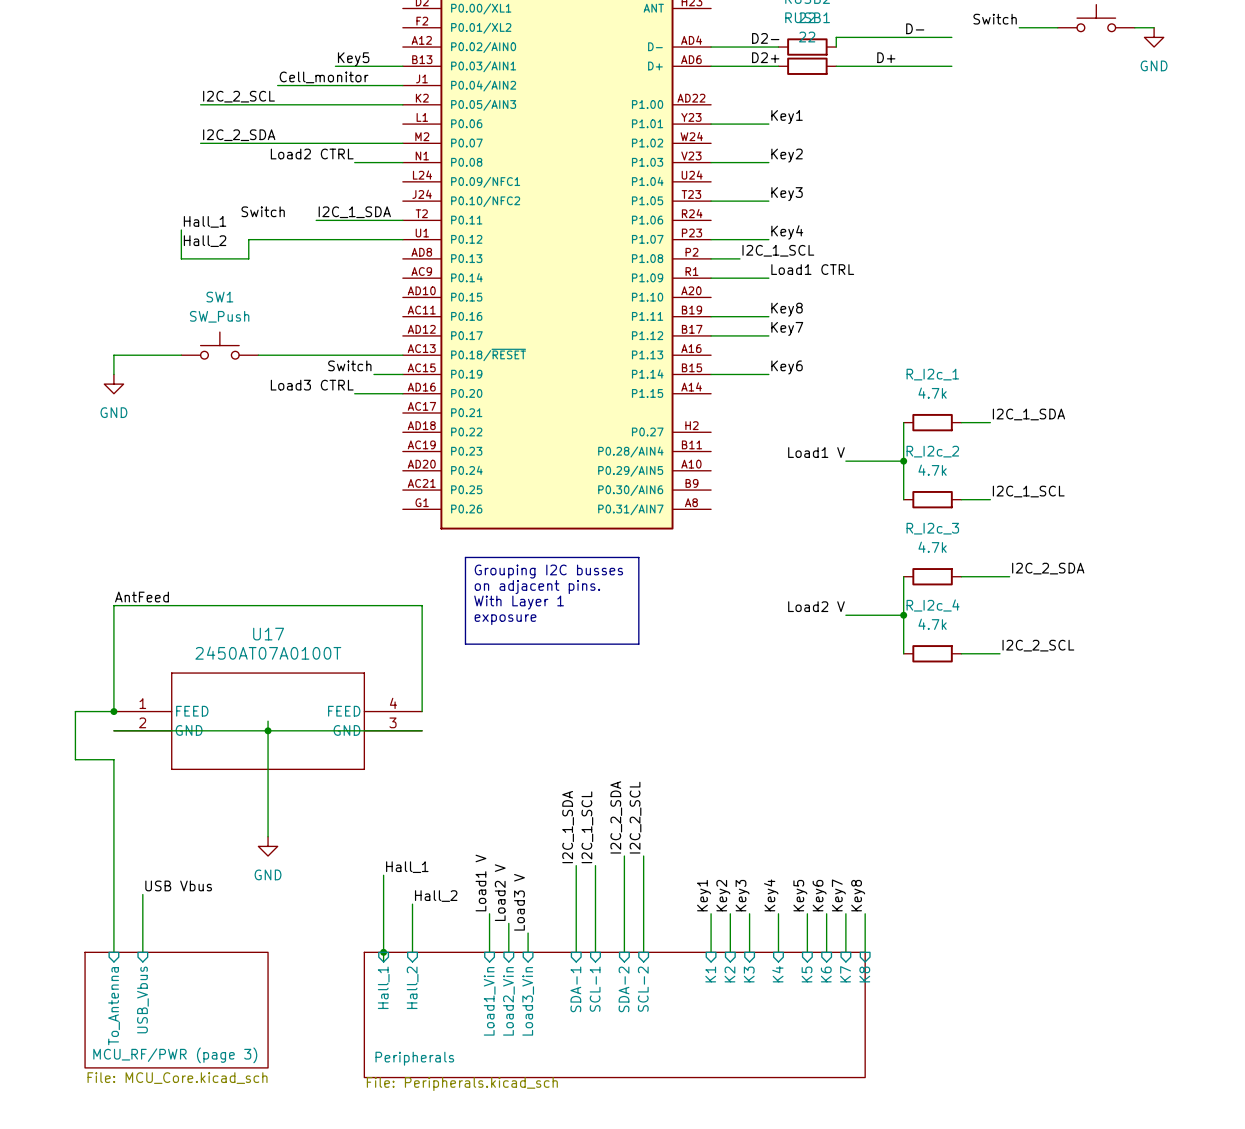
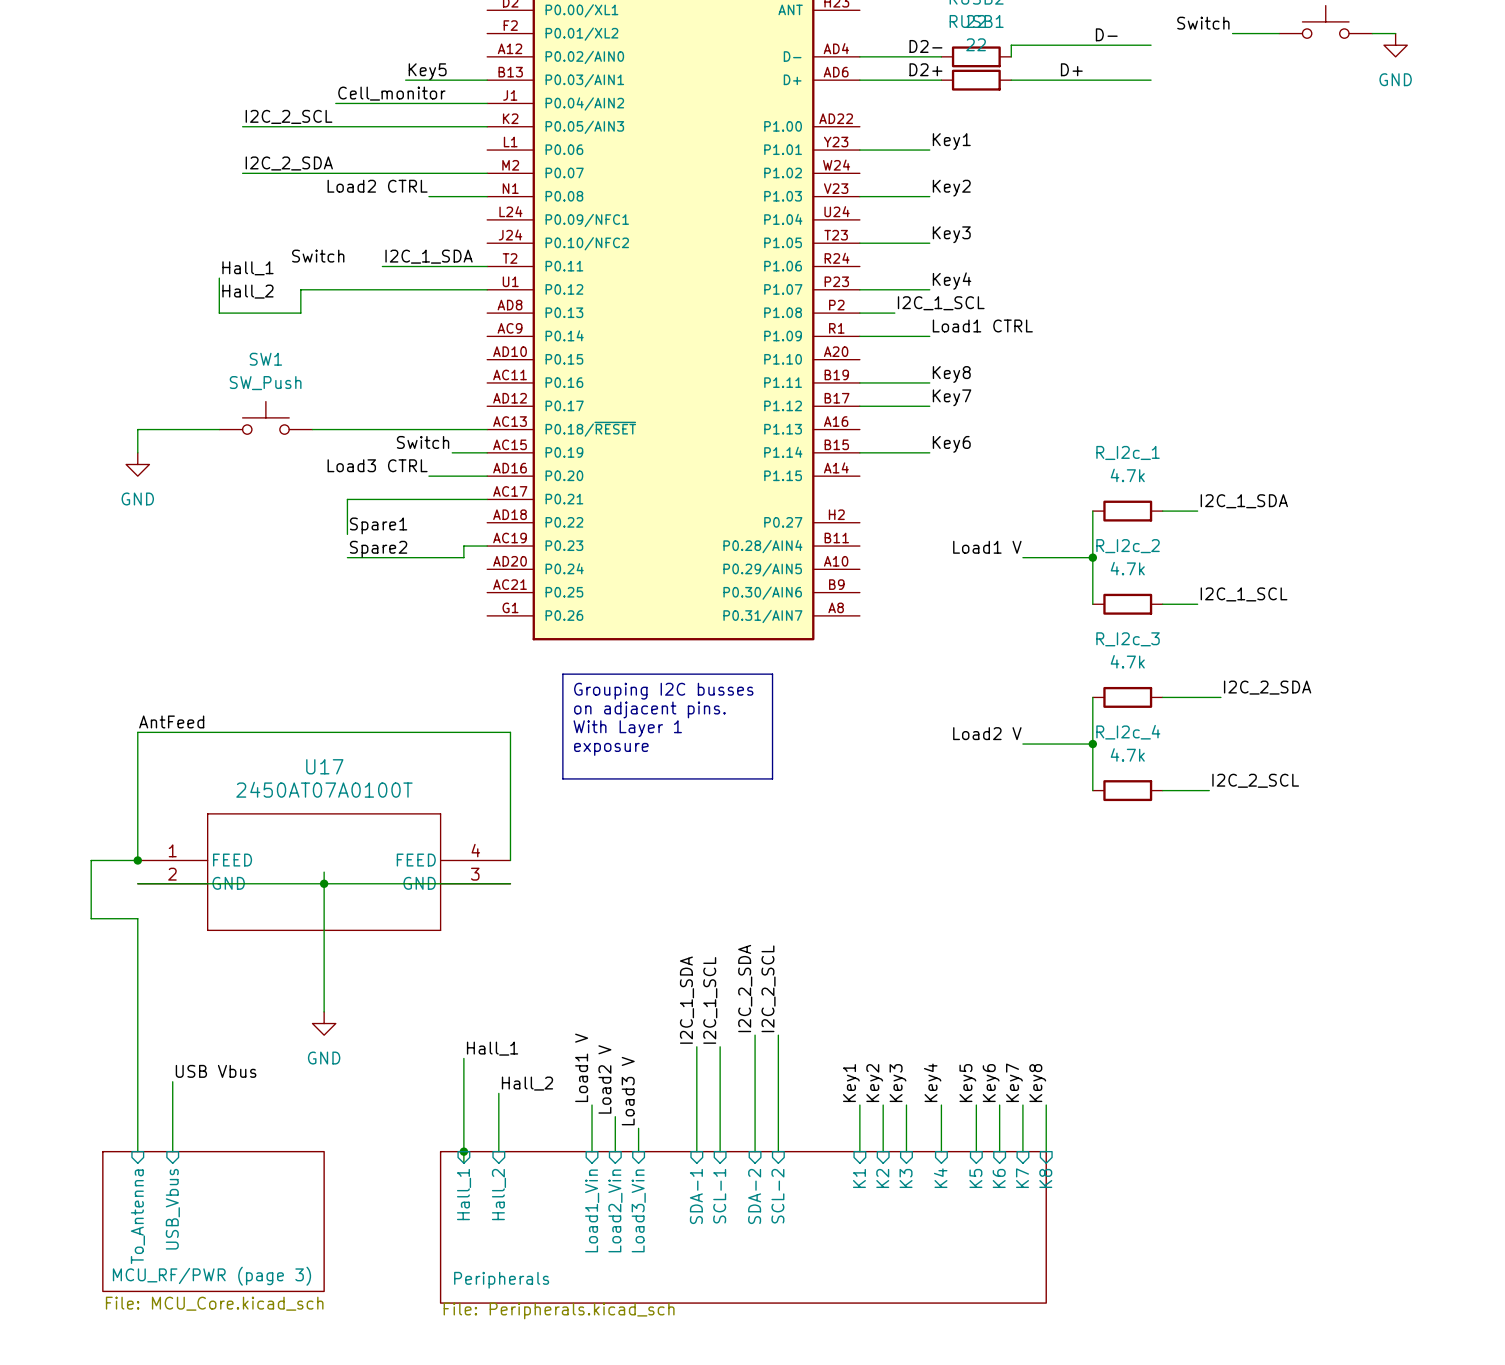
wire: none -> (487, 499) (347, 499) (347, 534)
label: none -> Spare1 (378, 525)
wire: none -> (487, 546) (463, 546) (463, 557) (347, 557)
label: none -> Spare2 (378, 549)

